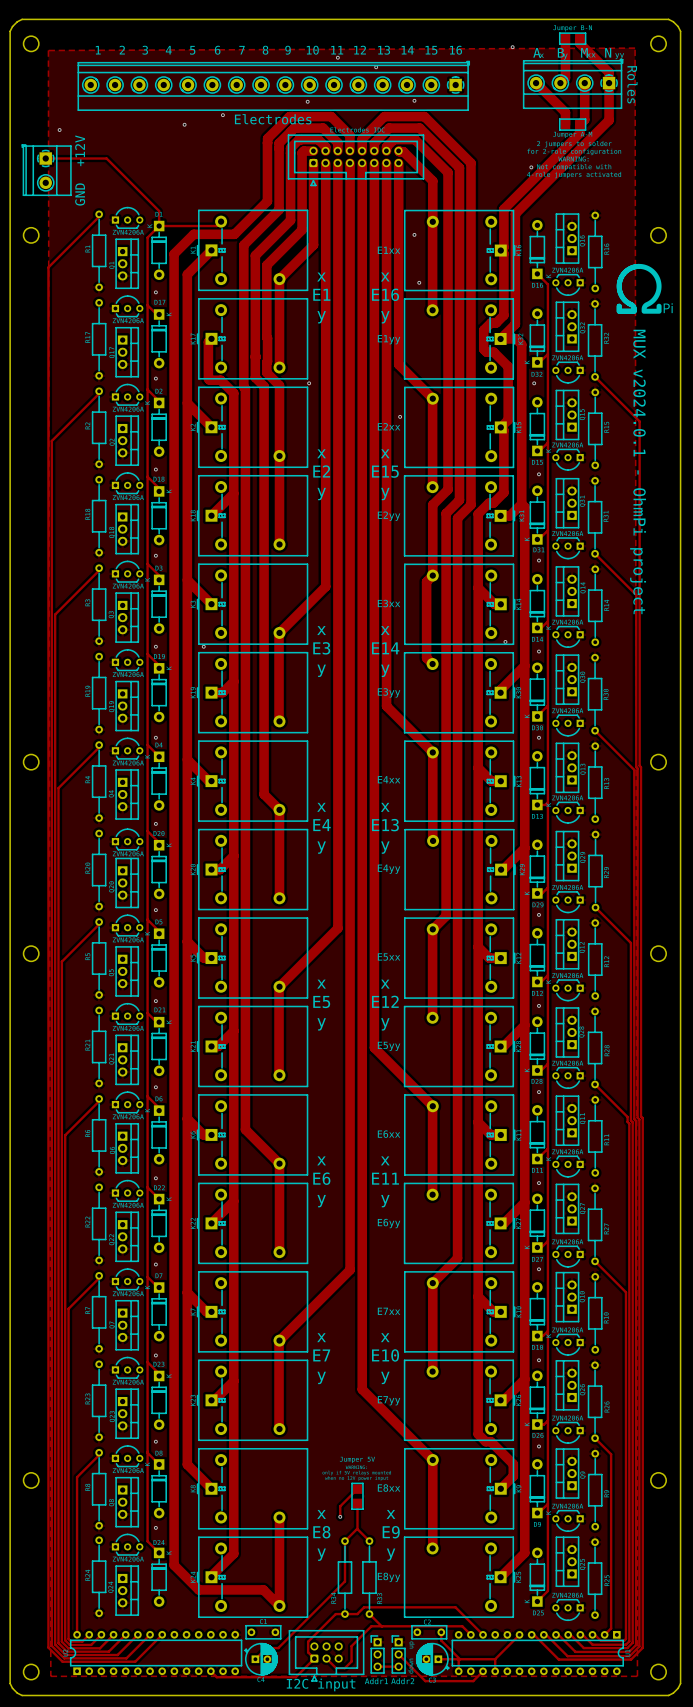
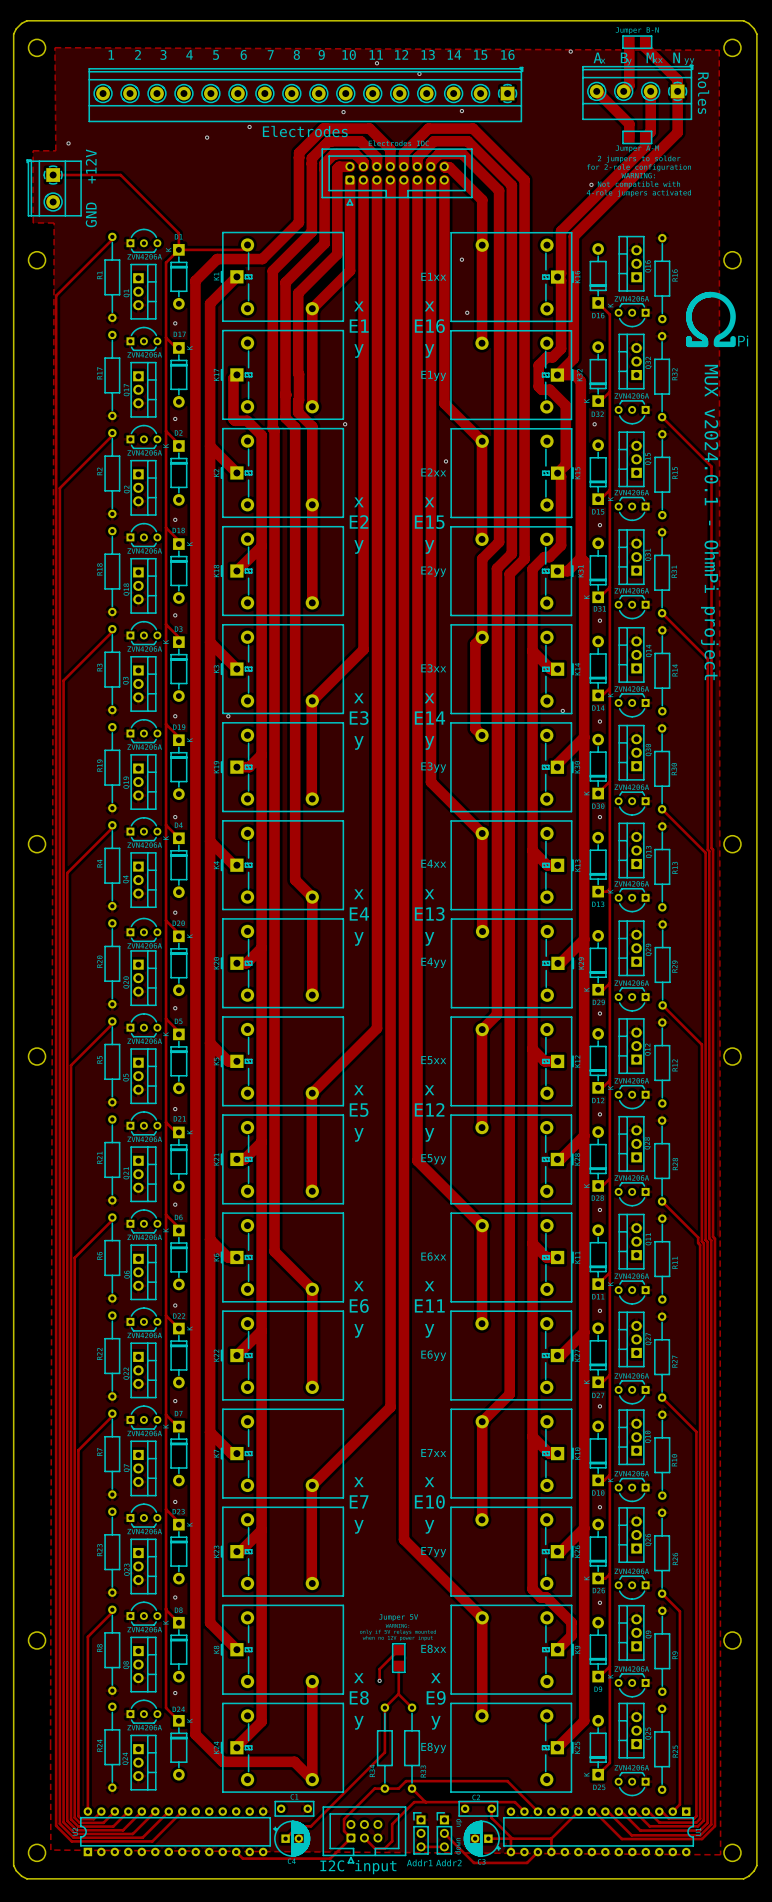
zone outline: (635, 48) (637, 1676) (50, 1676) (48, 50) (635, 48) -> (54, 47) (55, 150) (33, 150) (33, 222) (54, 223) (50, 1850) (720, 1854) (719, 50) (54, 47)

